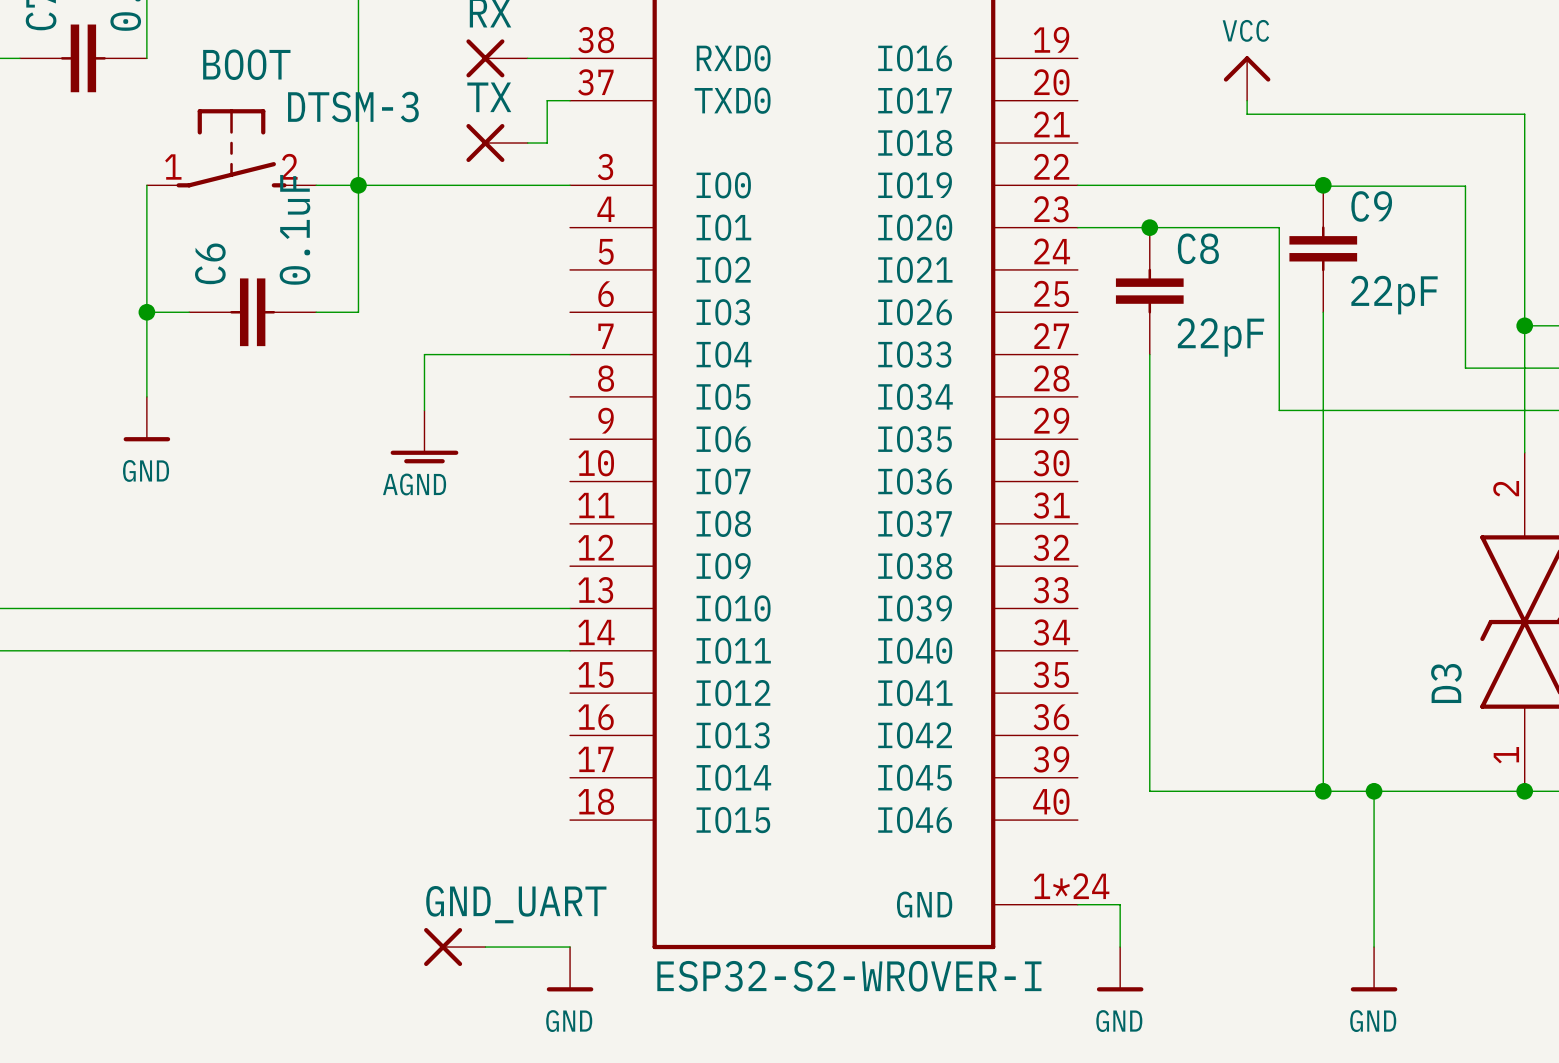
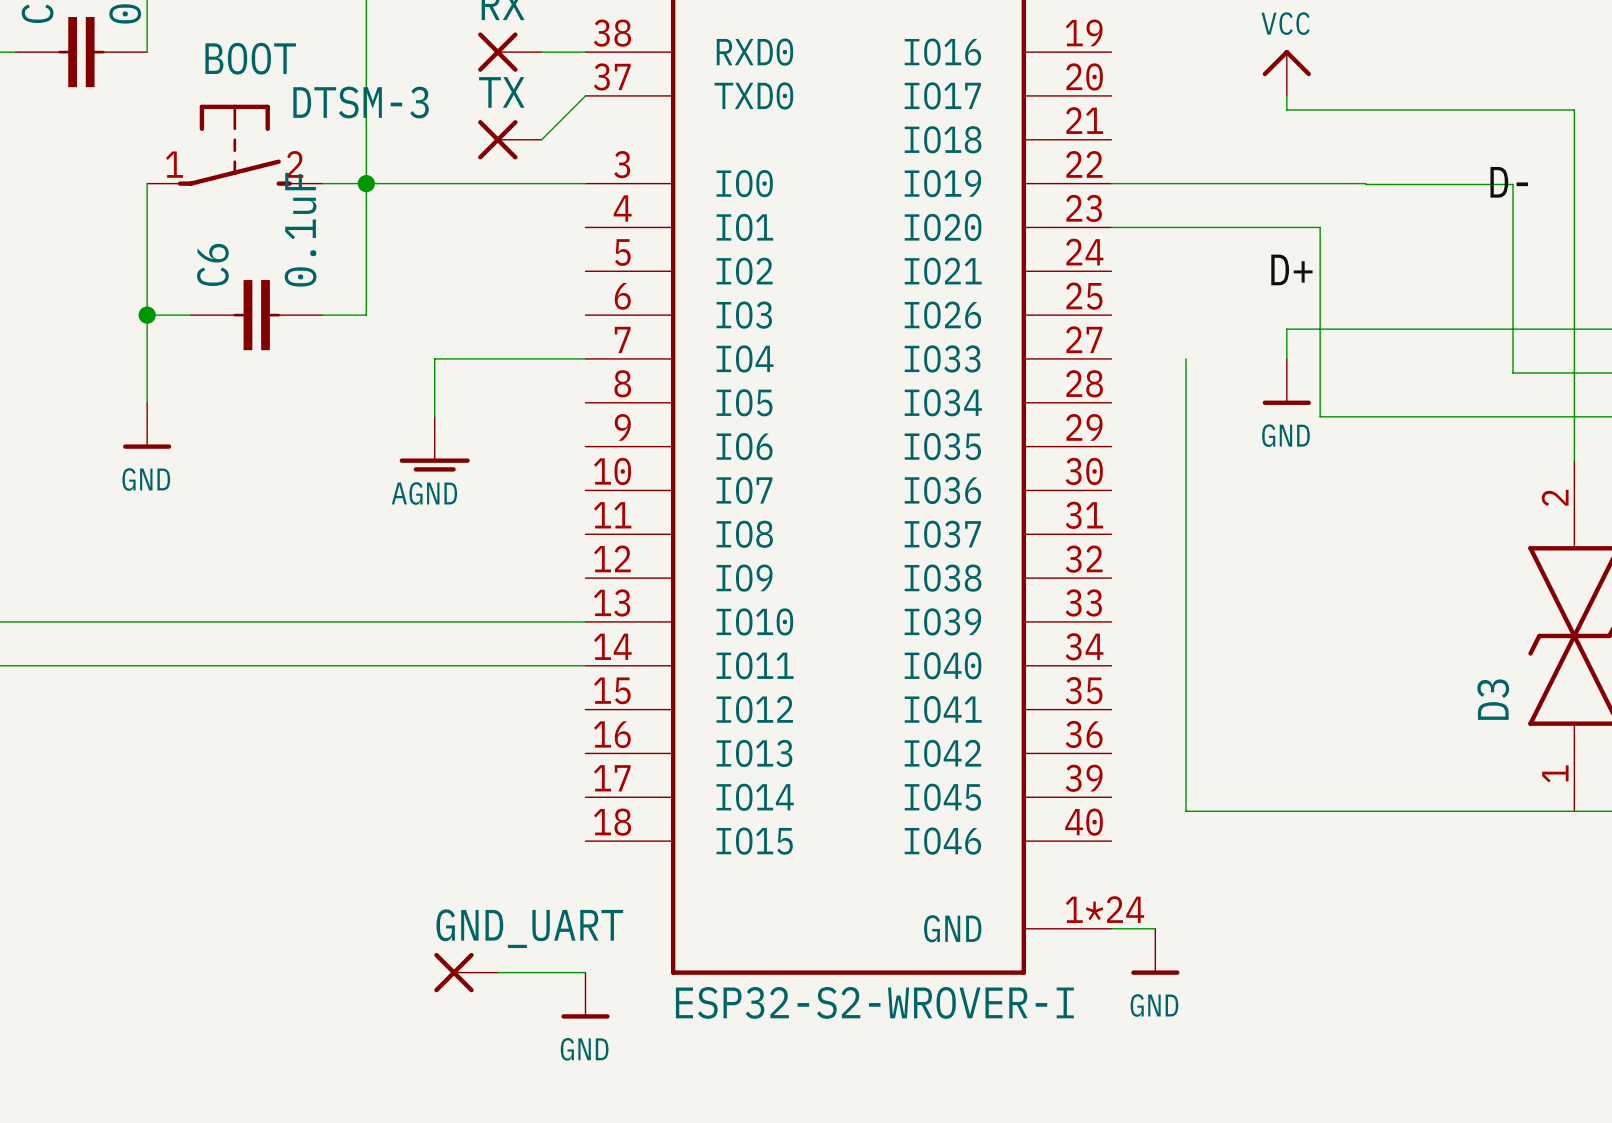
wire: (570, 100) (547, 100) (547, 143) (527, 143) -> (585, 95) (541, 139)
label: none -> D- (1509, 182)
junction: (1323, 185) -> none
junction: (1149, 227) -> none
C9: 22pF (1323, 248) -> none
label: none -> D+ (1291, 269)
C8: 22pF (1149, 291) -> none
wire: (1323, 312) (1323, 791) -> none
wire: none -> (1574, 329) (1286, 329) (1286, 358)
junction: (1524, 325) -> none
power symbol: none -> GND (1286, 381)
junction: (1323, 791) -> none
wire: (1374, 791) (1374, 947) -> none
junction: (1374, 791) -> none
junction: (1524, 791) -> none
power symbol position: GND (1120, 969) -> GND (1155, 951)
power symbol: GND (1374, 969) -> none

